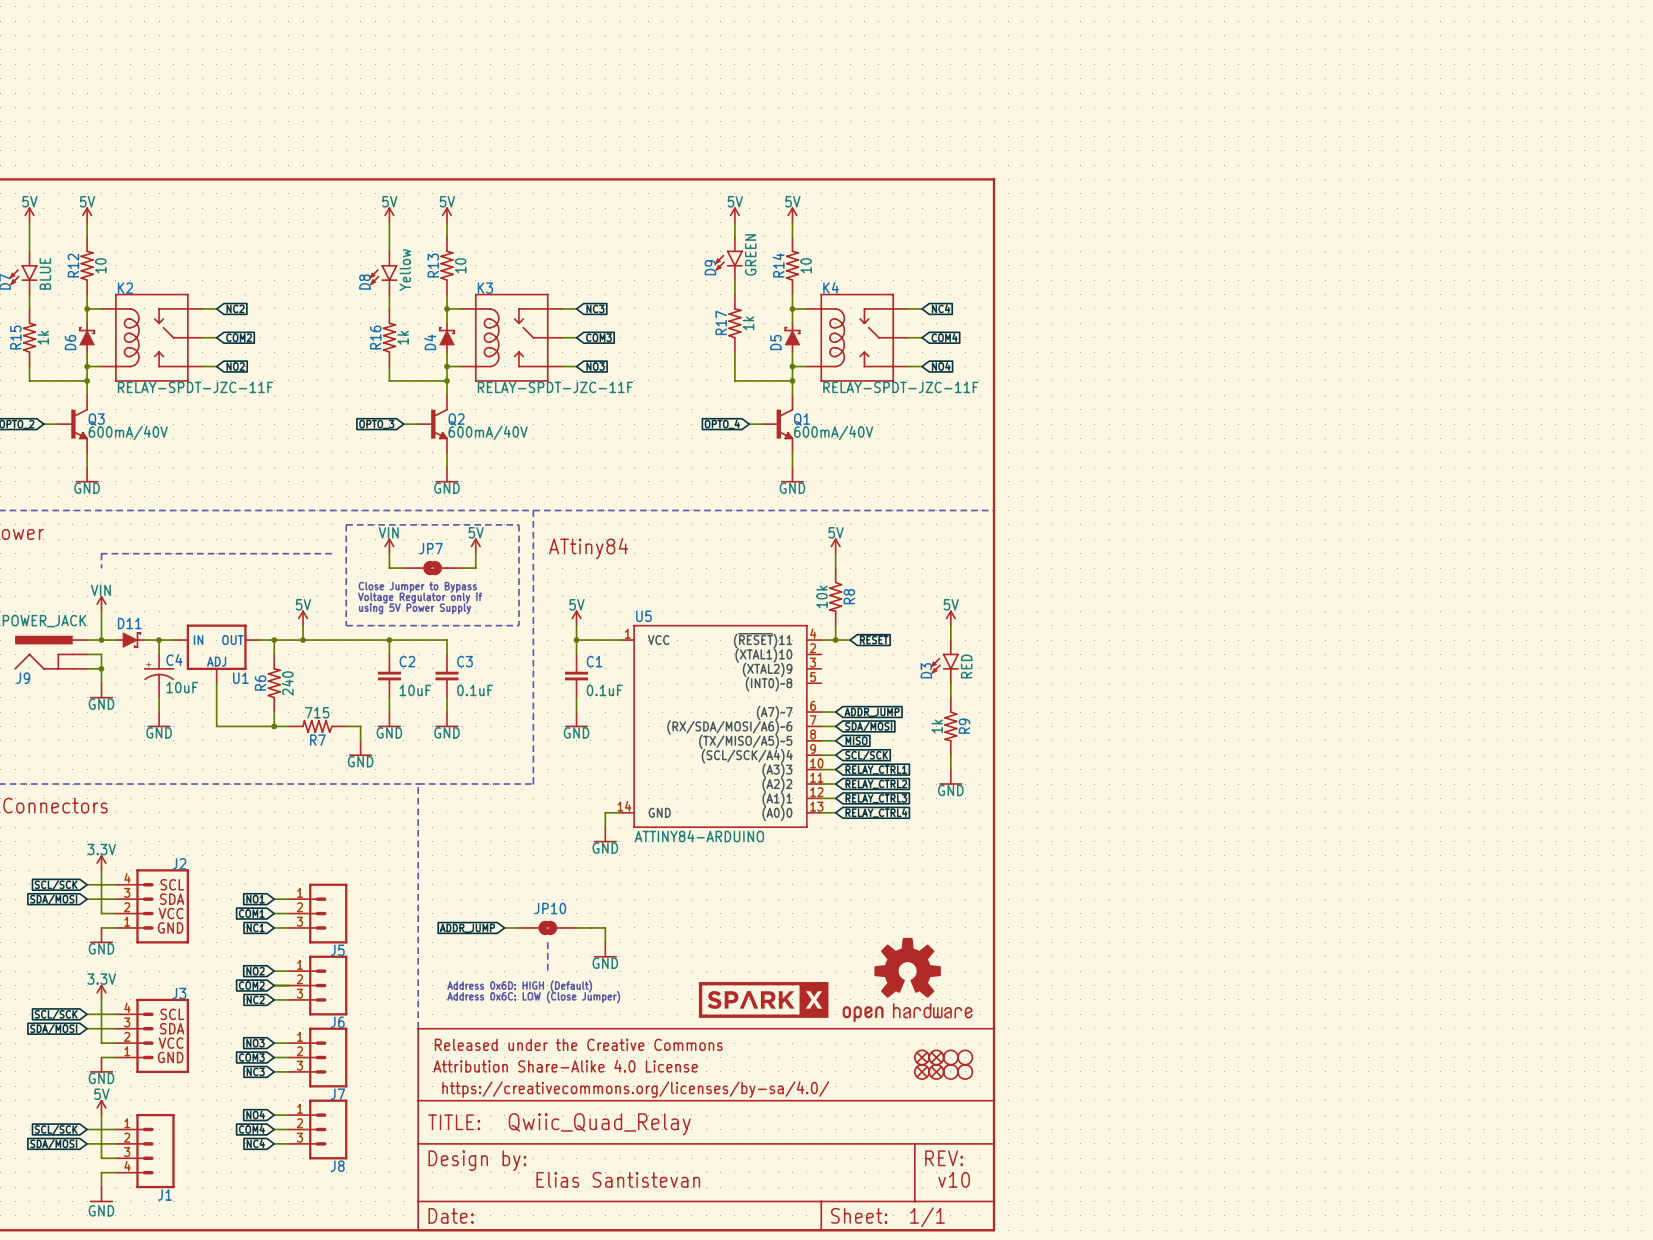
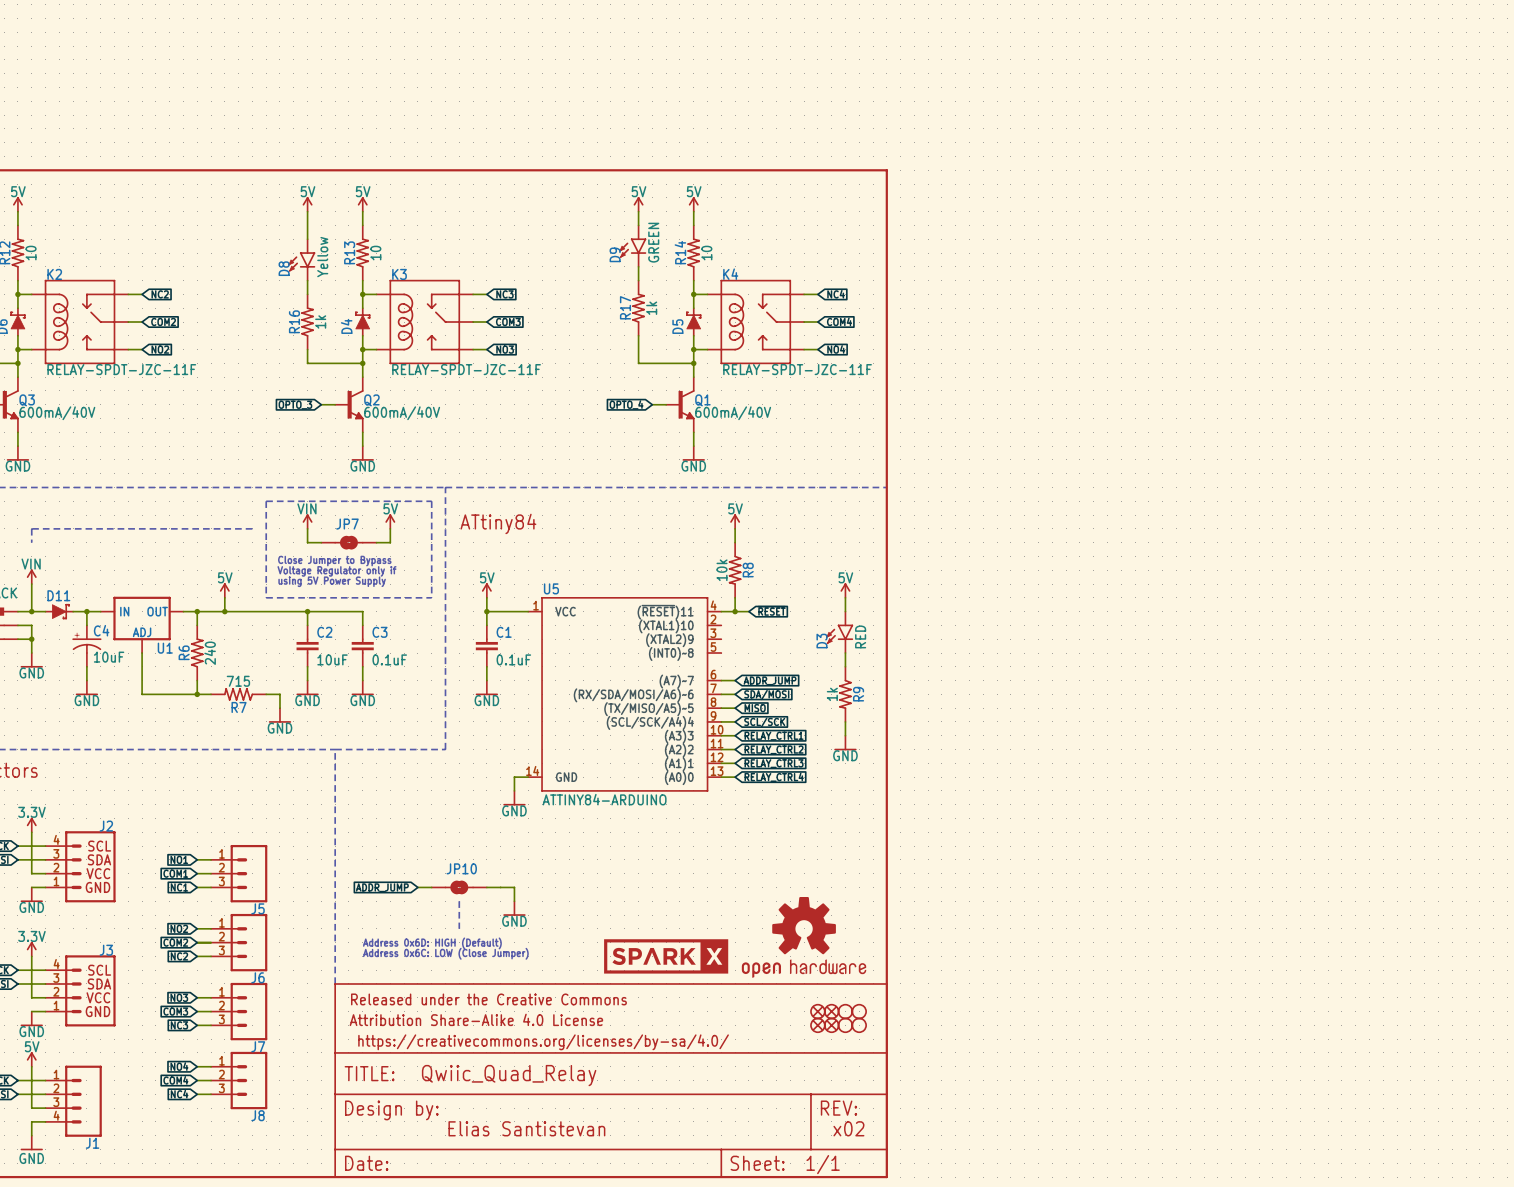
text: v10 (954, 1179) -> x02 (848, 1128)

